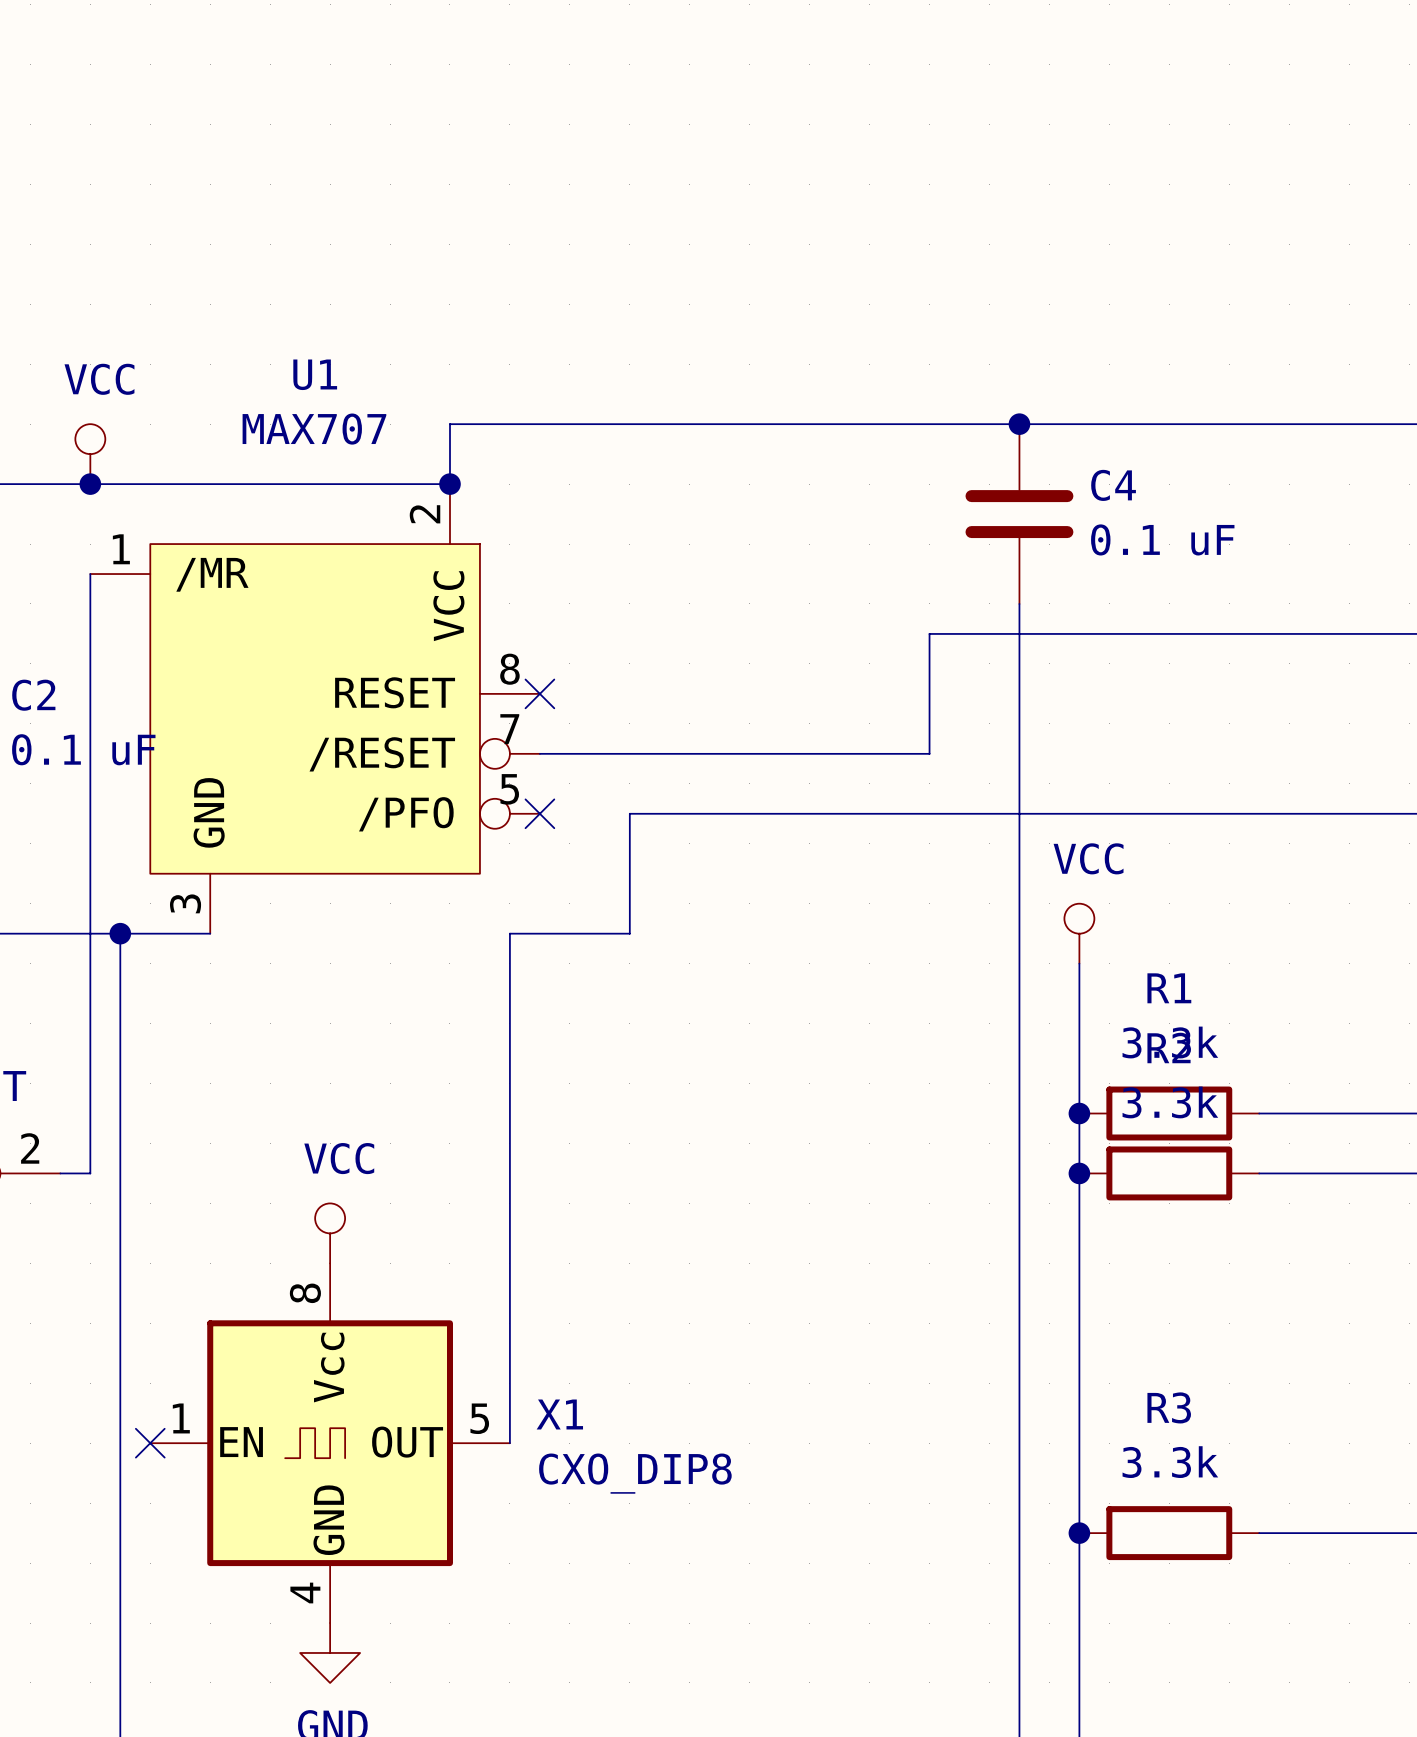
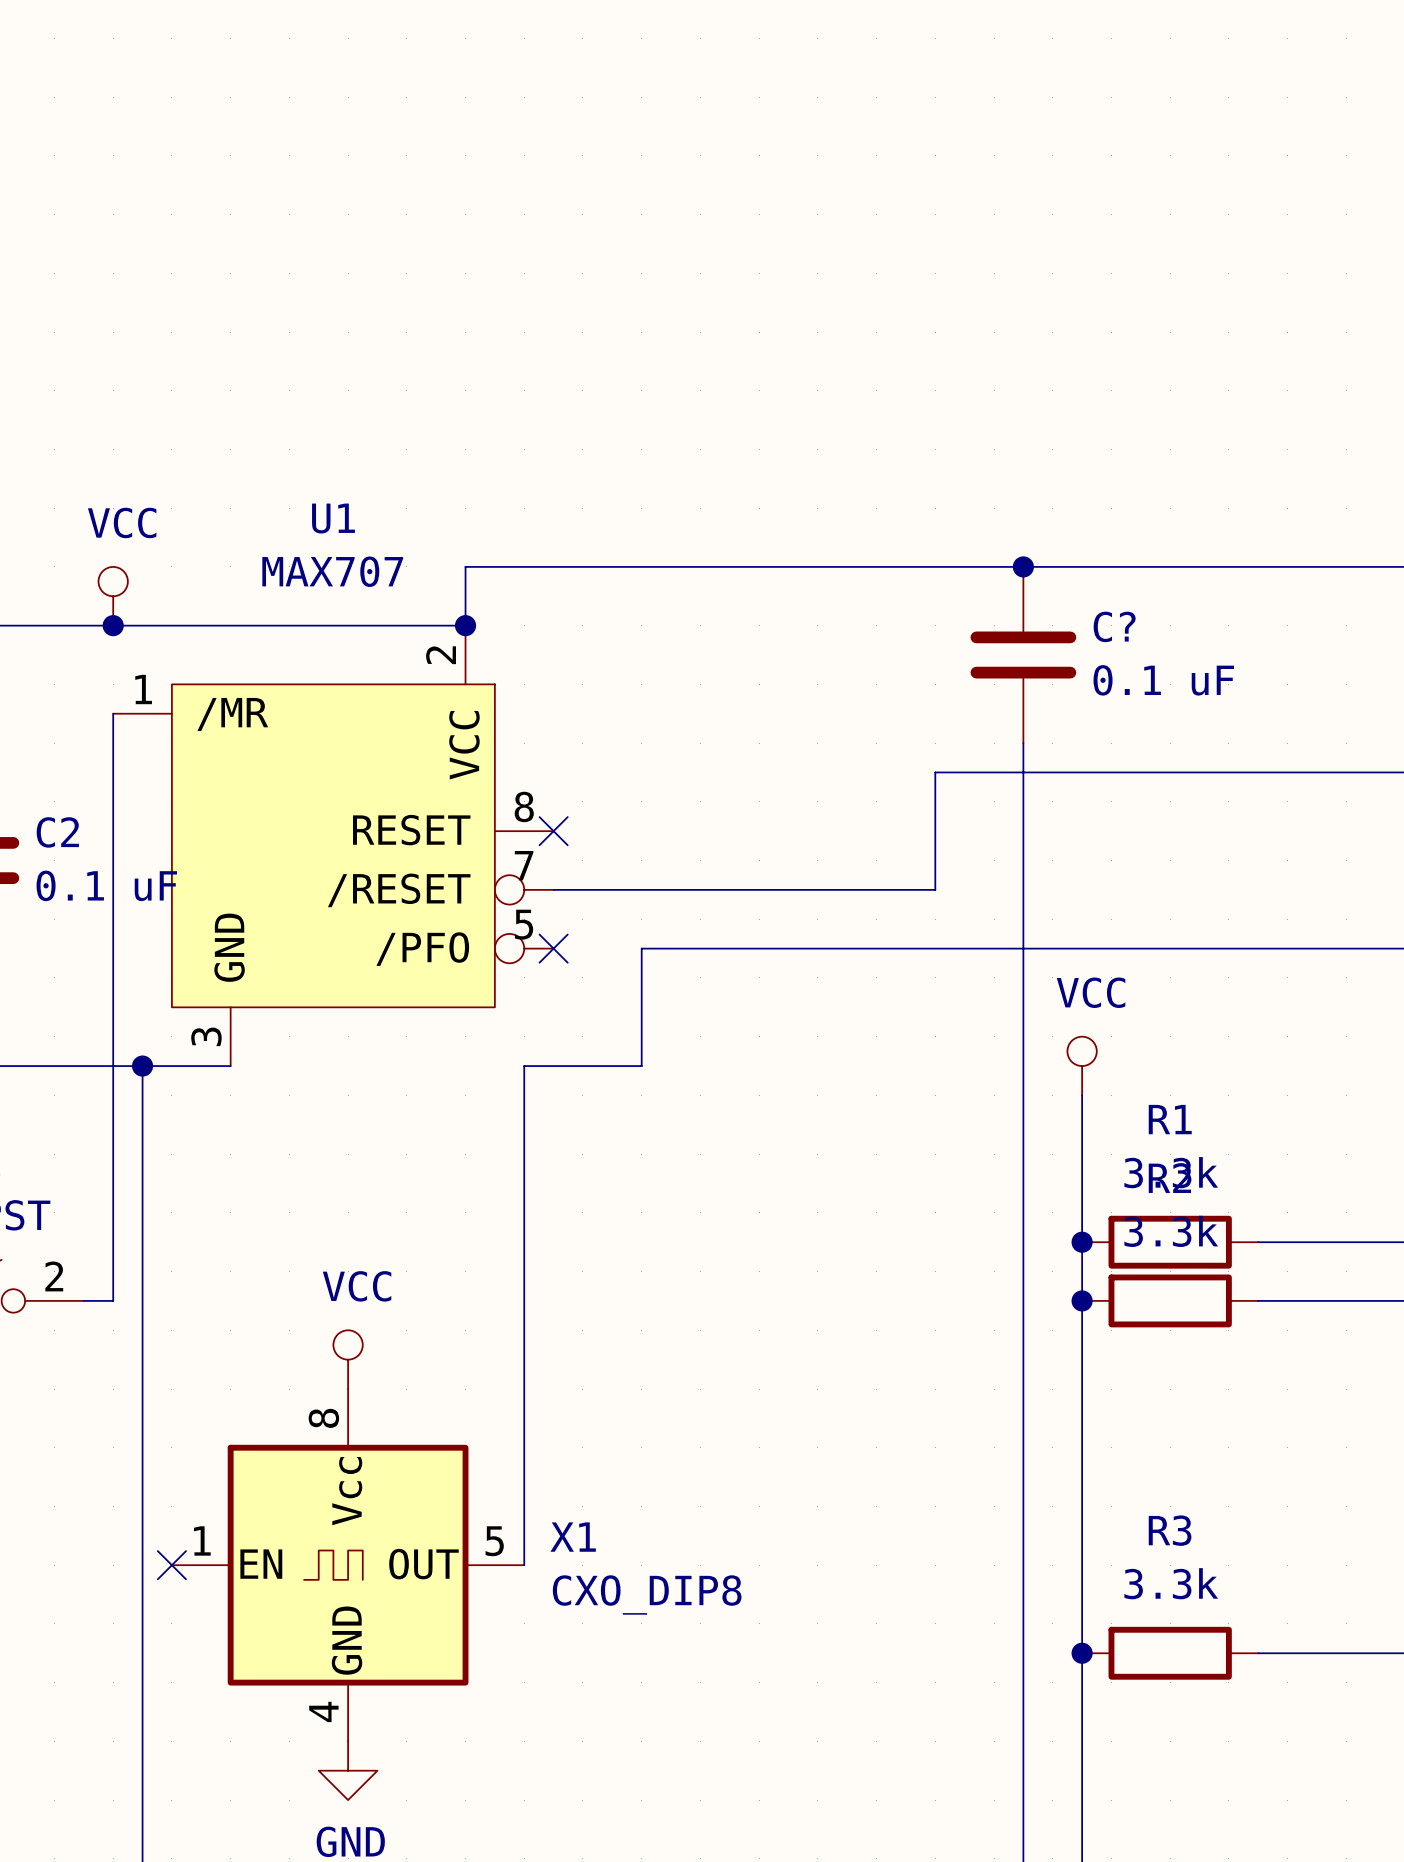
C4 name: C4 (1113, 485) -> C? (1114, 626)

